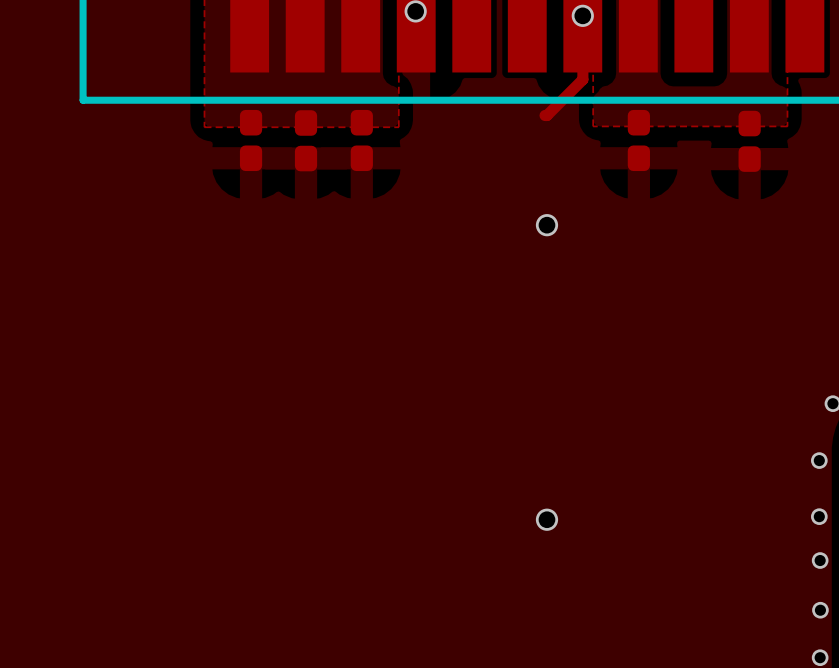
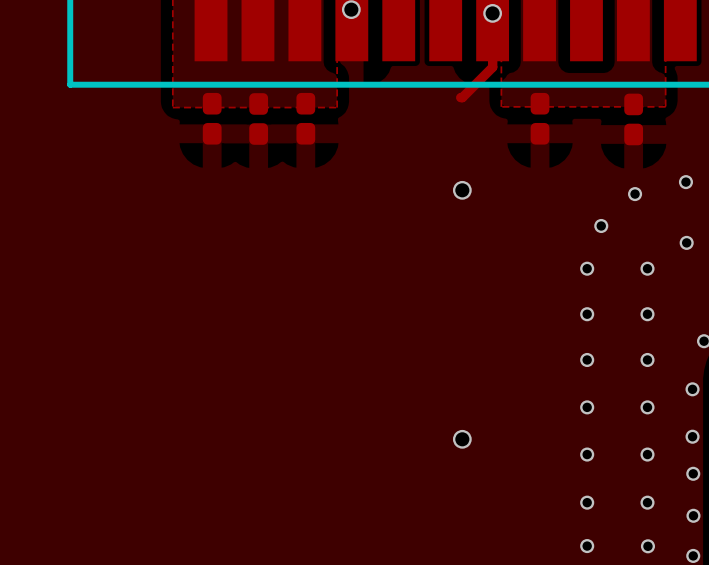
via: none -> (685, 182)
via: none -> (635, 194)
via: none -> (601, 225)
via: none -> (686, 242)
via: none -> (587, 268)
via: none -> (647, 268)
via: none -> (587, 314)
via: none -> (647, 314)
via: none -> (587, 359)
via: none -> (647, 359)
via: none -> (587, 407)
via: none -> (647, 407)
via: none -> (587, 454)
via: none -> (647, 454)
via: none -> (587, 502)
via: none -> (647, 502)
via: none -> (587, 546)
via: none -> (647, 546)

